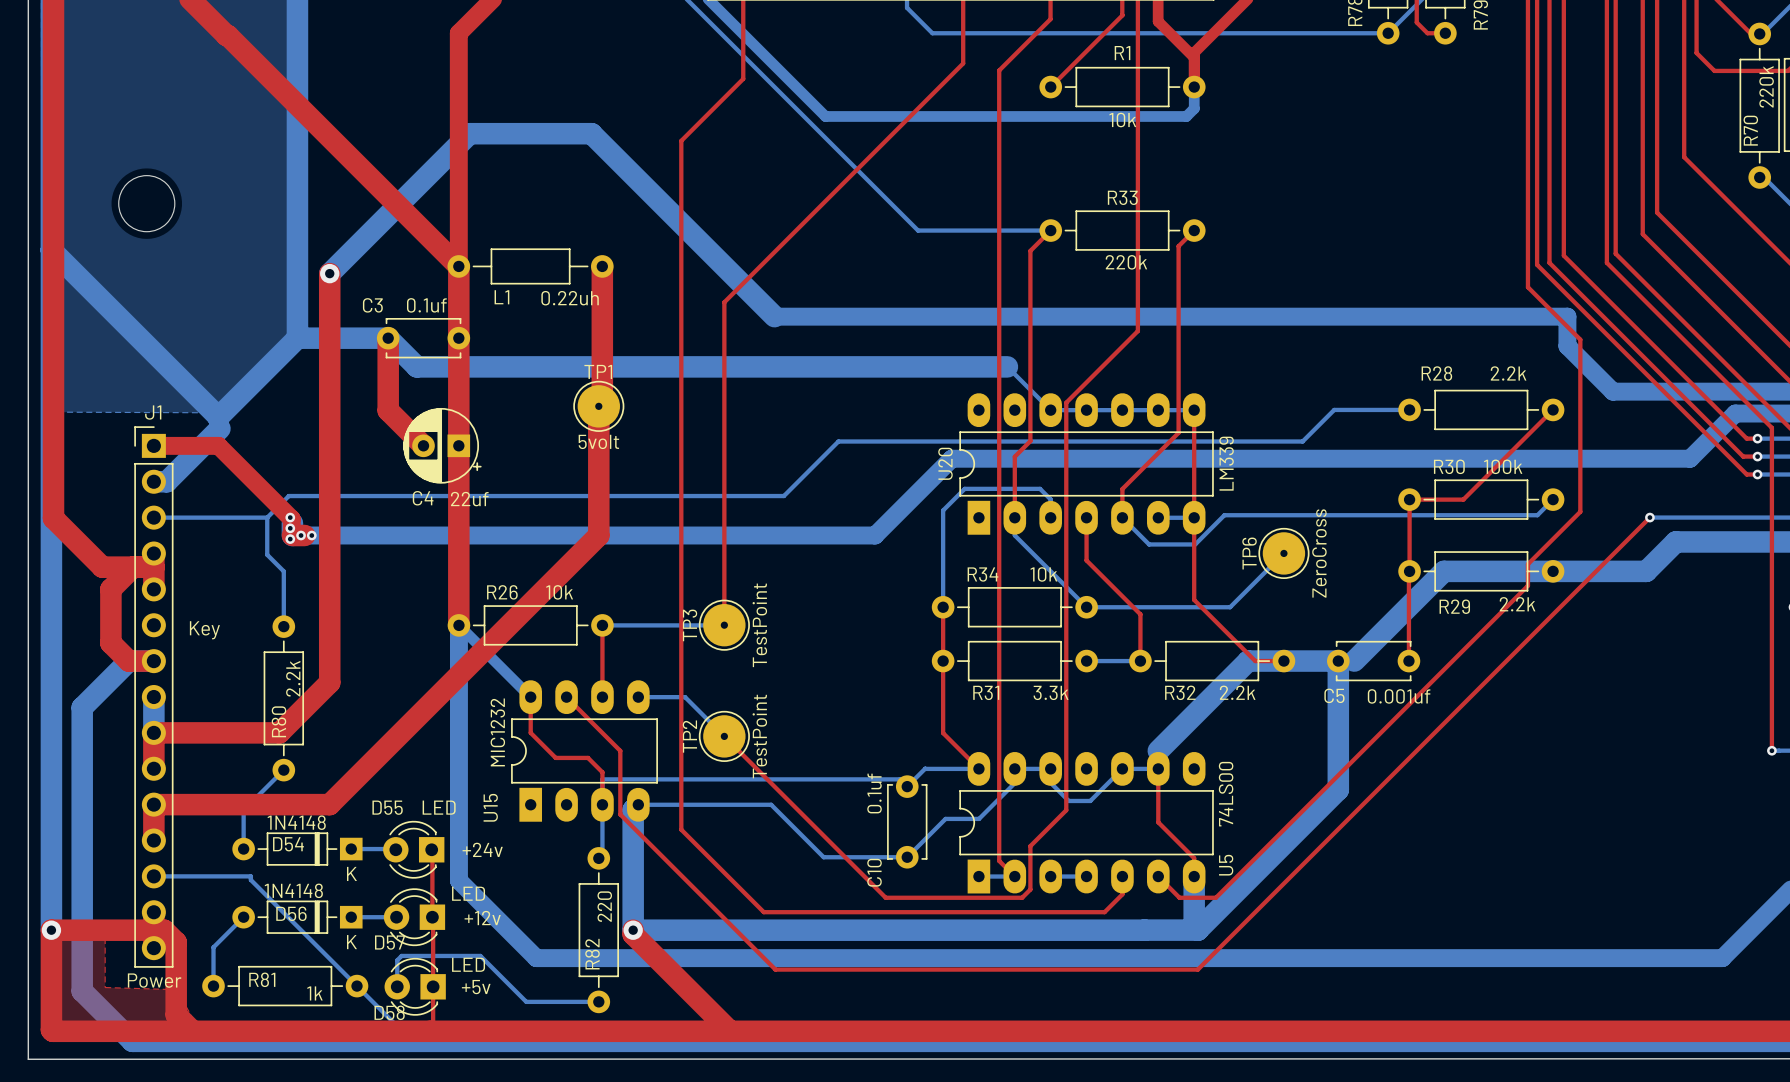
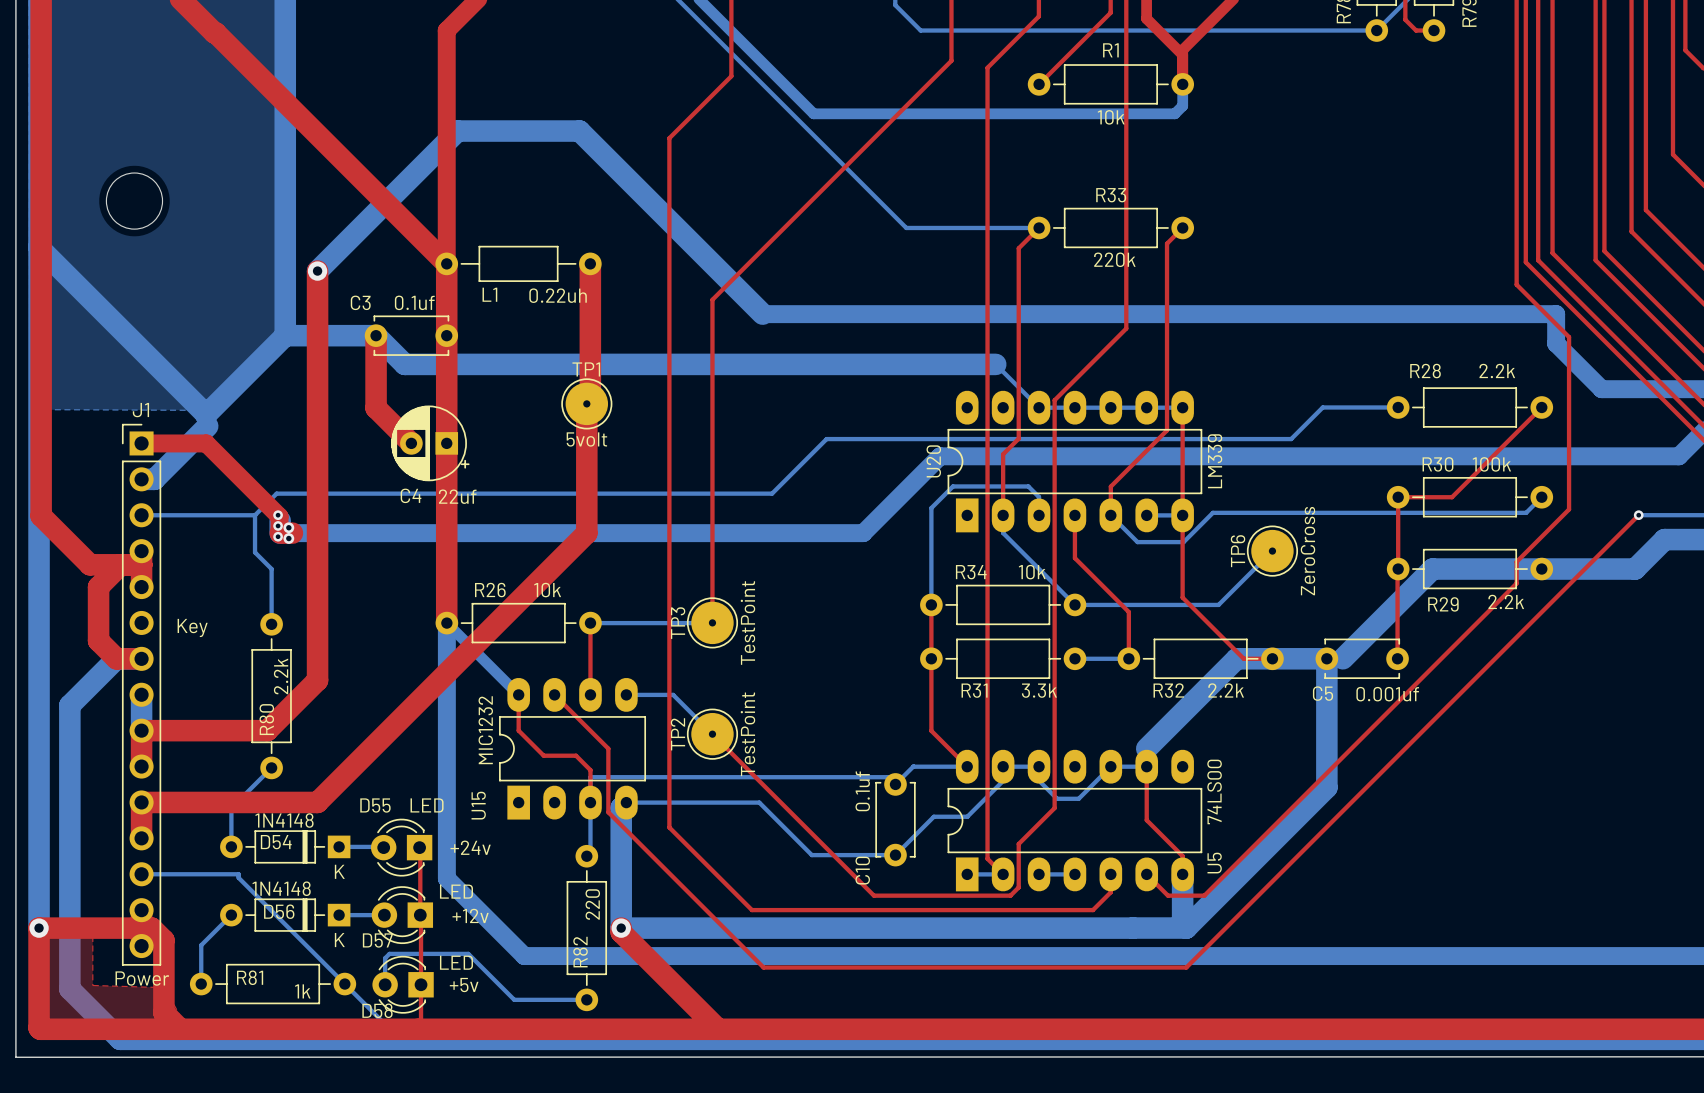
via: none -> (288, 527)
via: (301, 535) -> none
via: (311, 535) -> none
via: none -> (288, 538)

